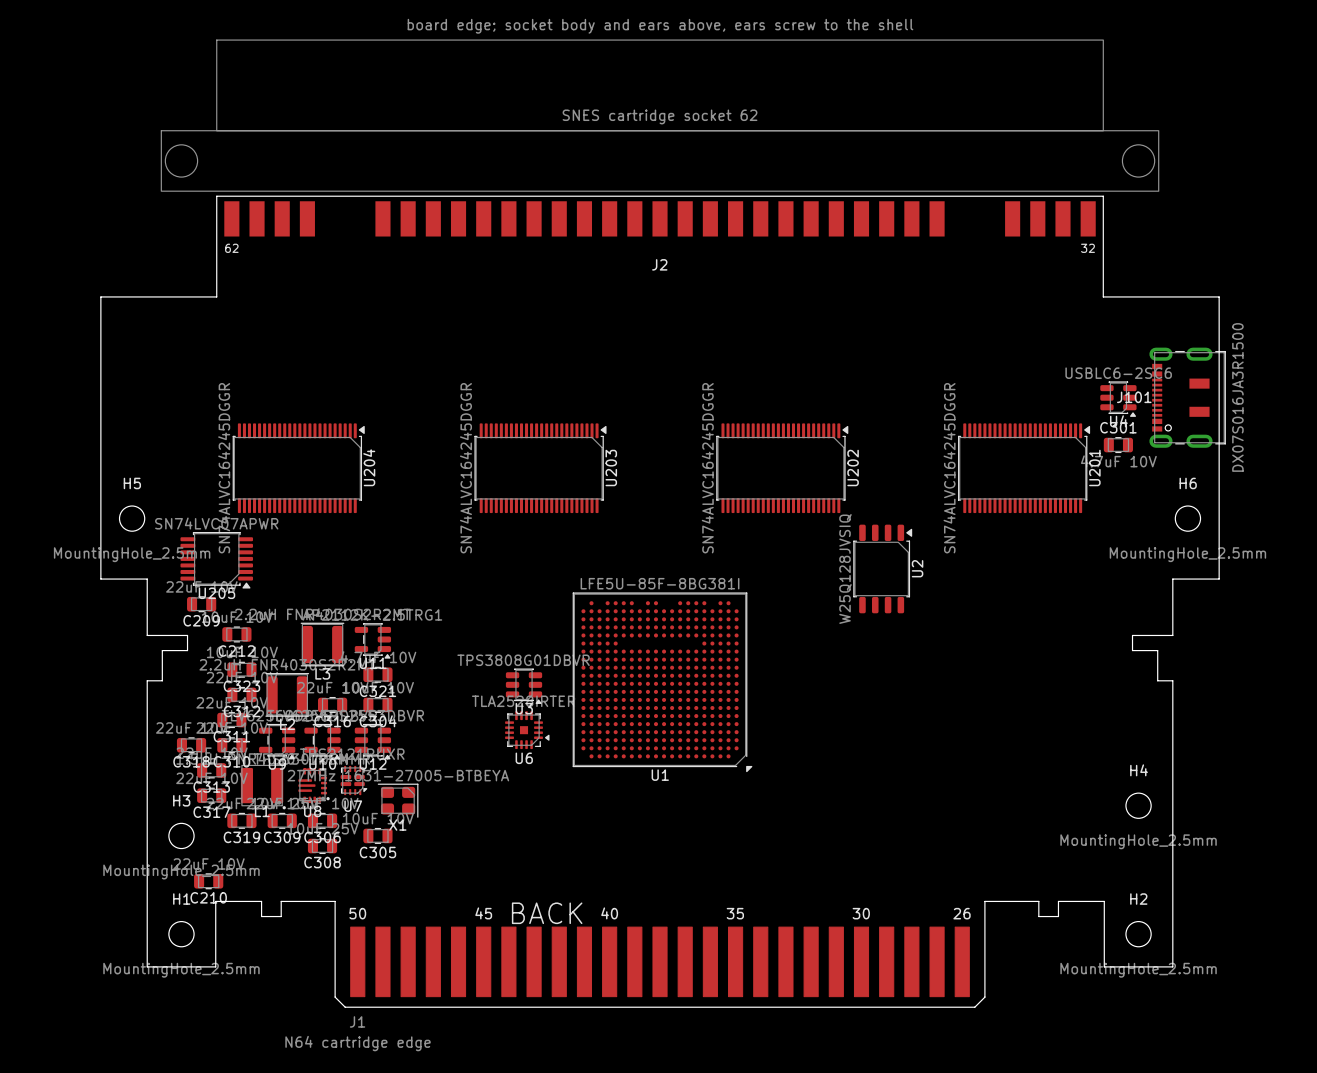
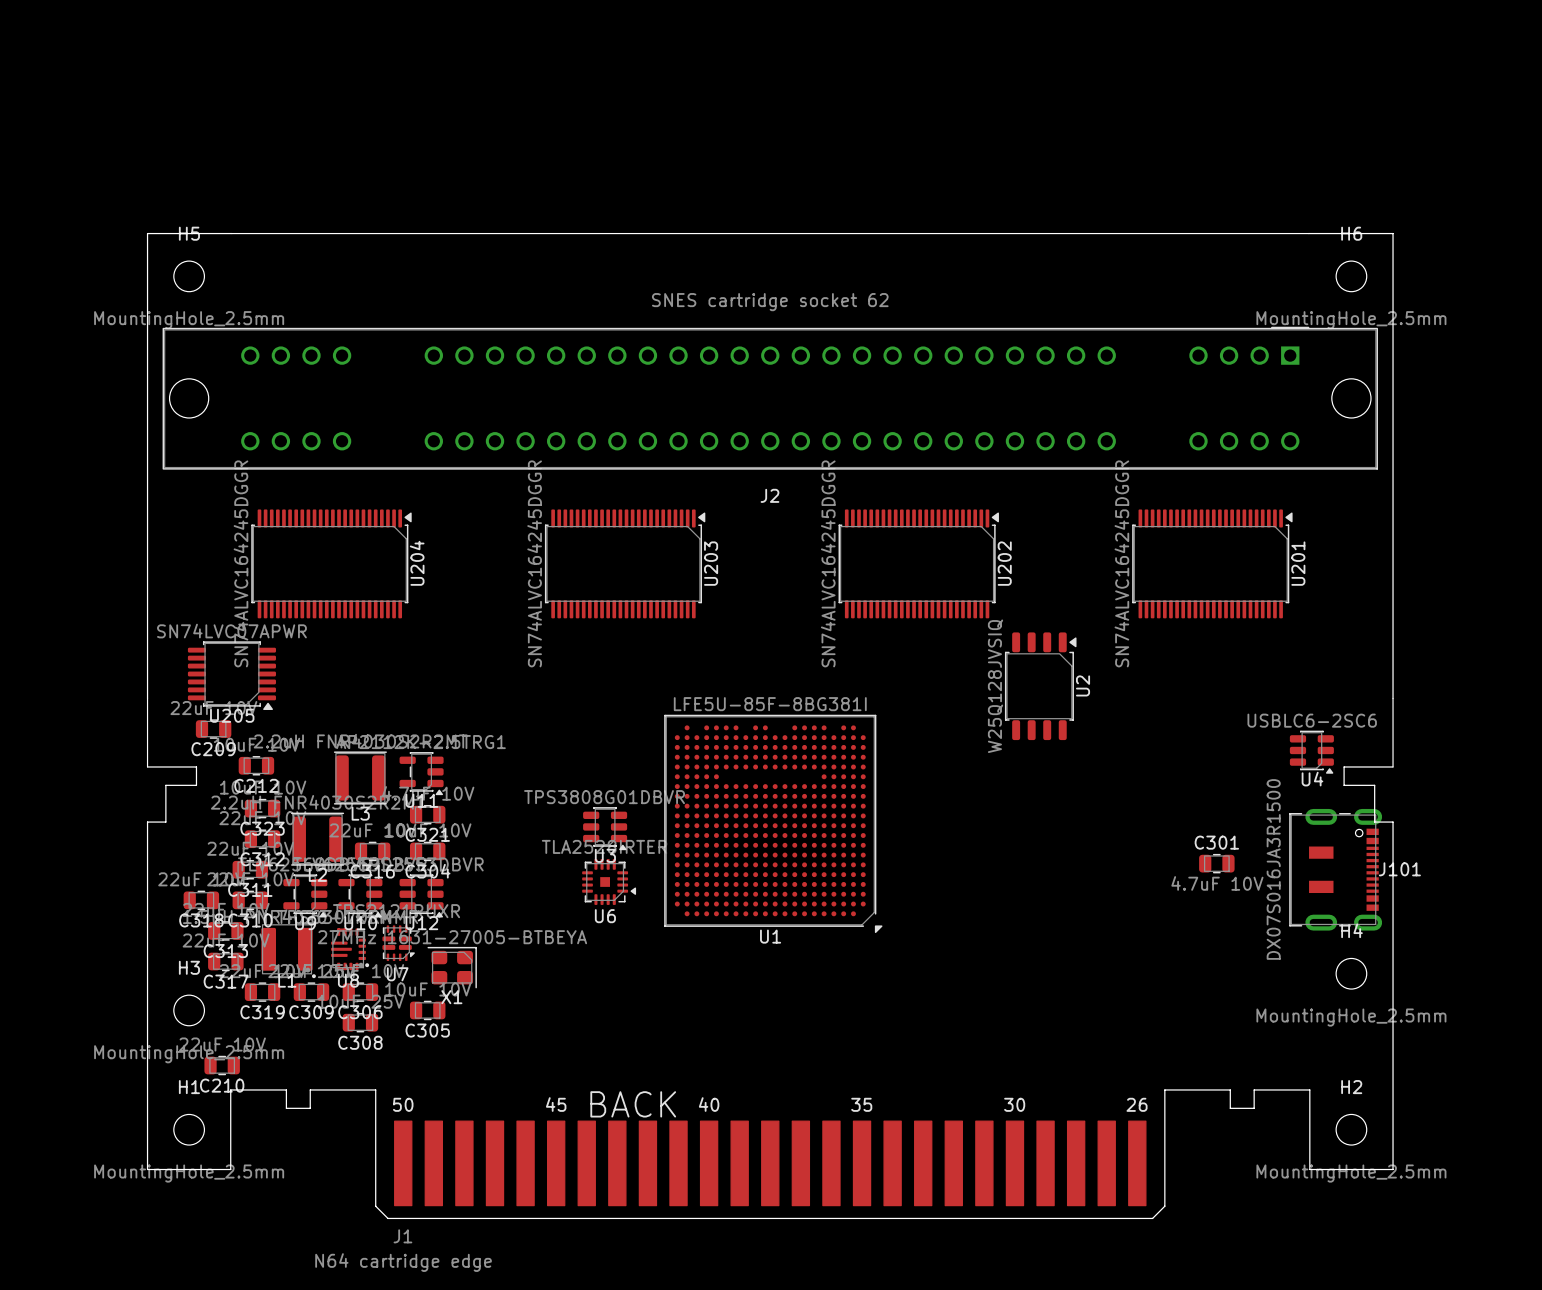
J2 footprint: [160, 39, 1160, 237] -> [162, 326, 1378, 470]
J2 value position: SNES cartridge socket 62 (660, 116) -> SNES cartridge socket 62 (770, 302)
board edge: (216, 196) (216, 296) (100, 296) (100, 579) (147, 579) -> (231, 233) (147, 233) (147, 698)
board edge: (1103, 196) (1103, 296) (1219, 296) (1219, 579) (1172, 579) -> (1308, 233) (1393, 233) (1393, 698)
J2 name position: J2 (659, 264) -> J2 (769, 495)
J101 rotation: 0° (1187, 397) -> 180° (1335, 869)
J101 position: (1187, 397) -> (1335, 869)
U4 position: (1118, 399) -> (1311, 752)
C301 position: (1118, 445) -> (1216, 863)
H5 position: (132, 518) -> (189, 276)
H6 position: (1187, 518) -> (1351, 276)

